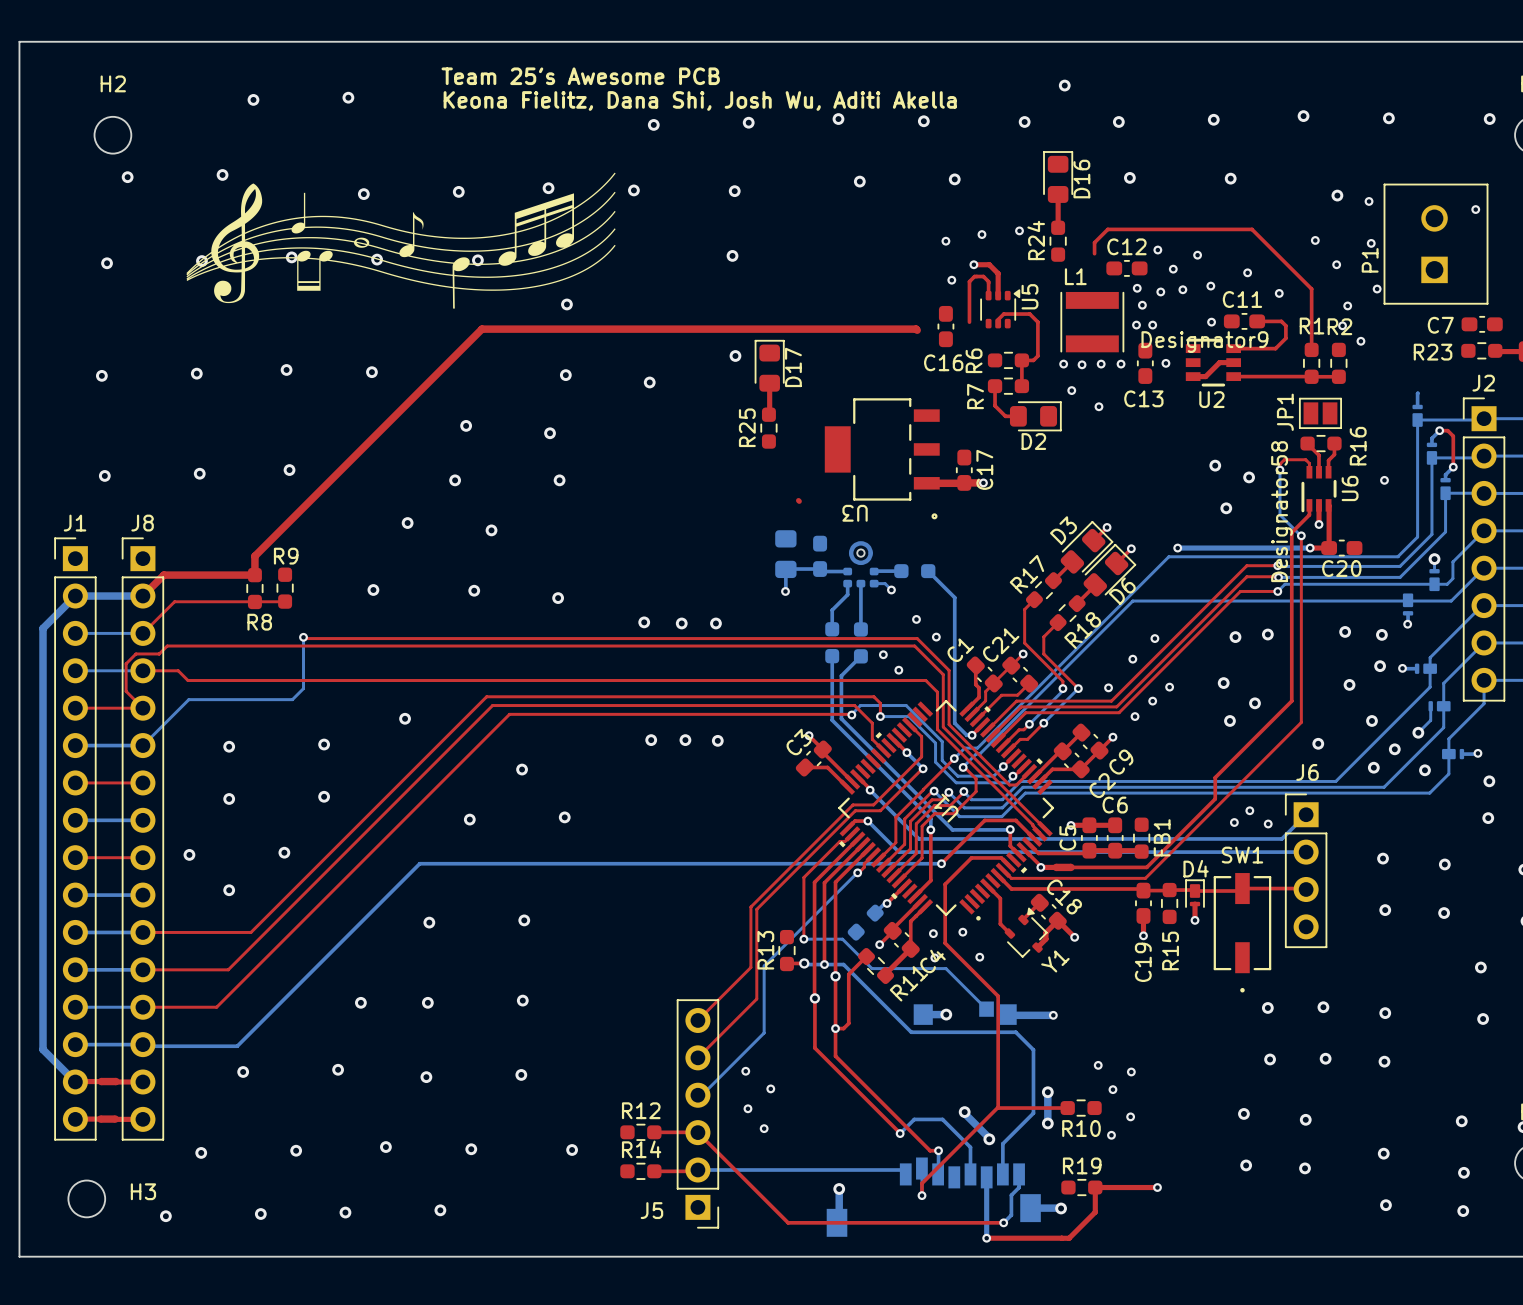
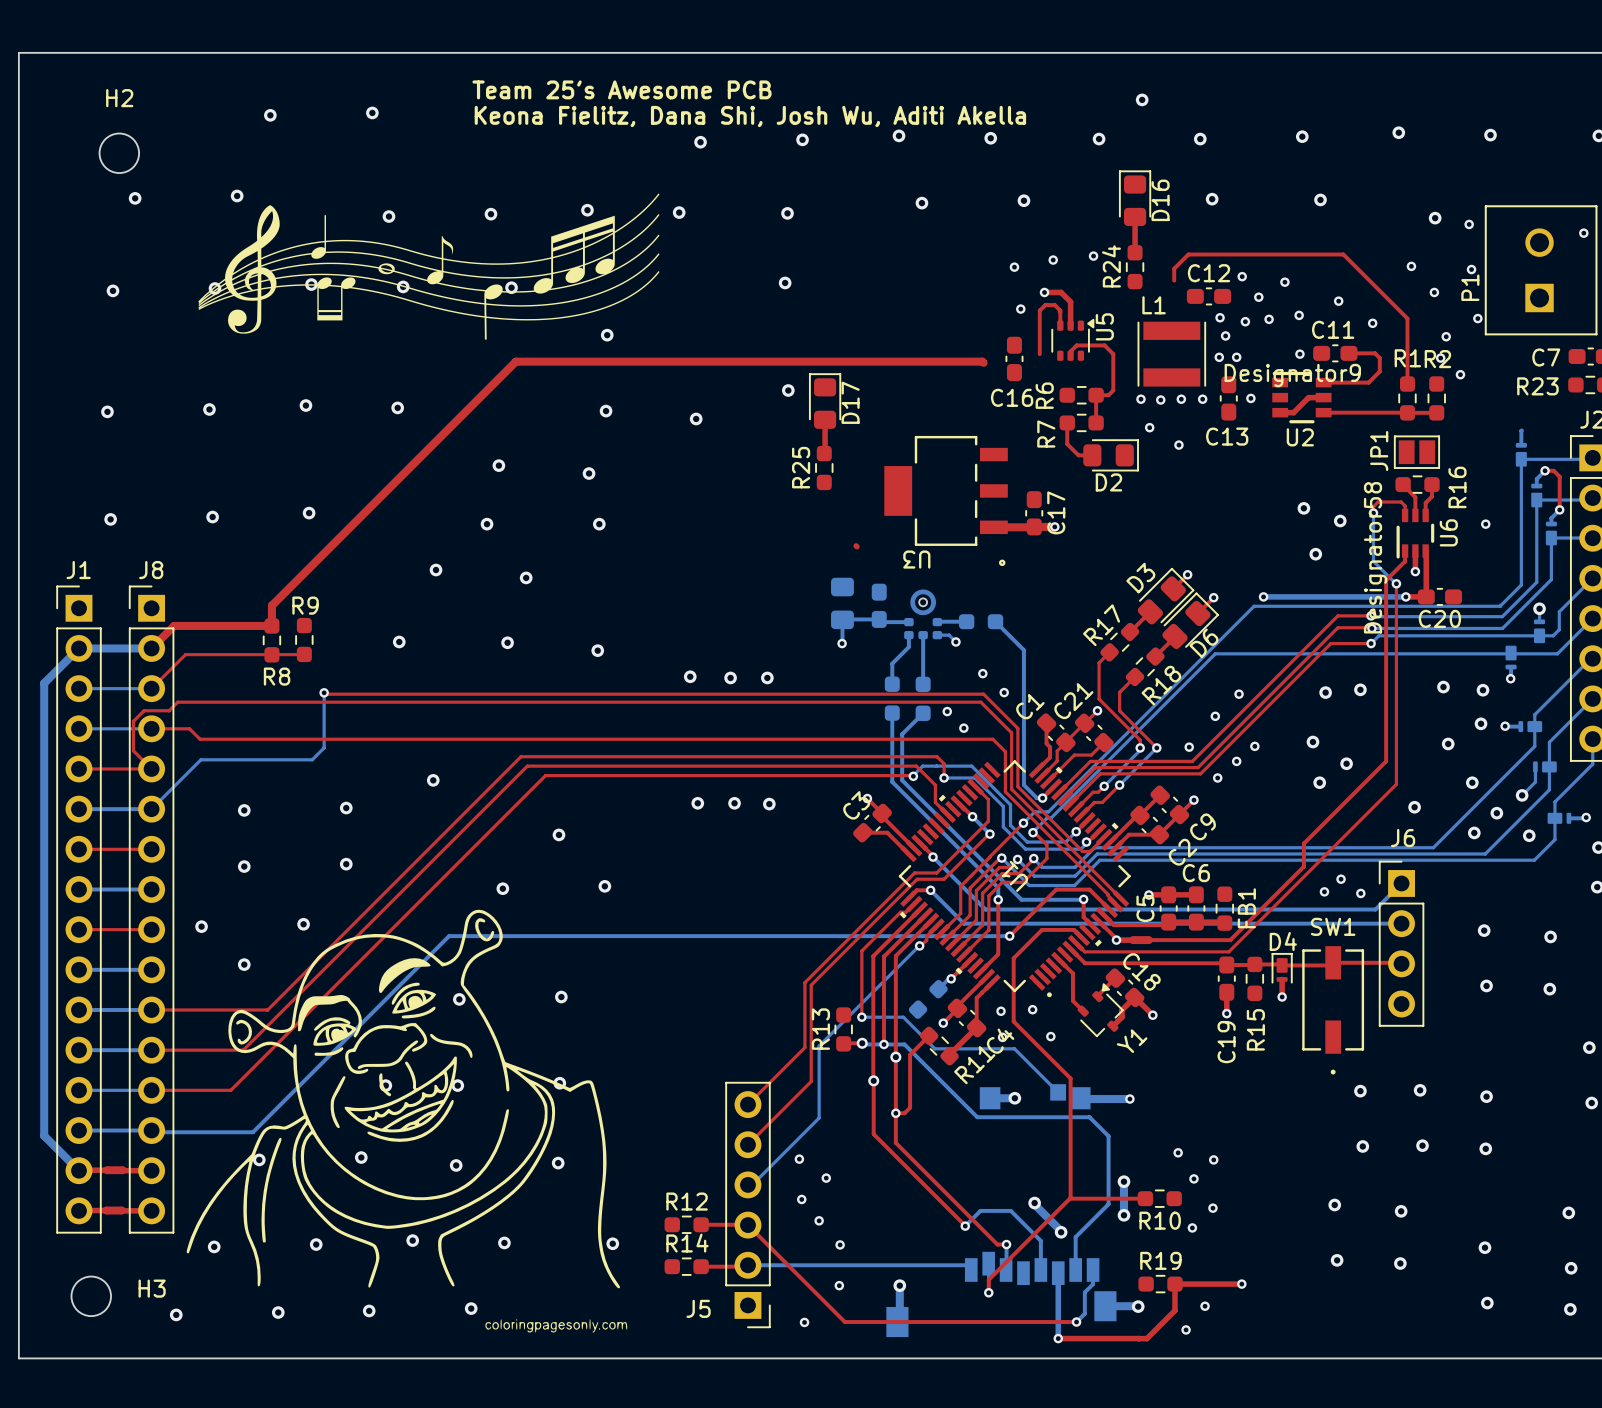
drawing: none -> [186, 909, 628, 1333]
via: none -> (840, 1244)
via: none -> (839, 1285)
via: none -> (1205, 1306)
via: none -> (804, 1322)
via: none -> (1186, 1329)

